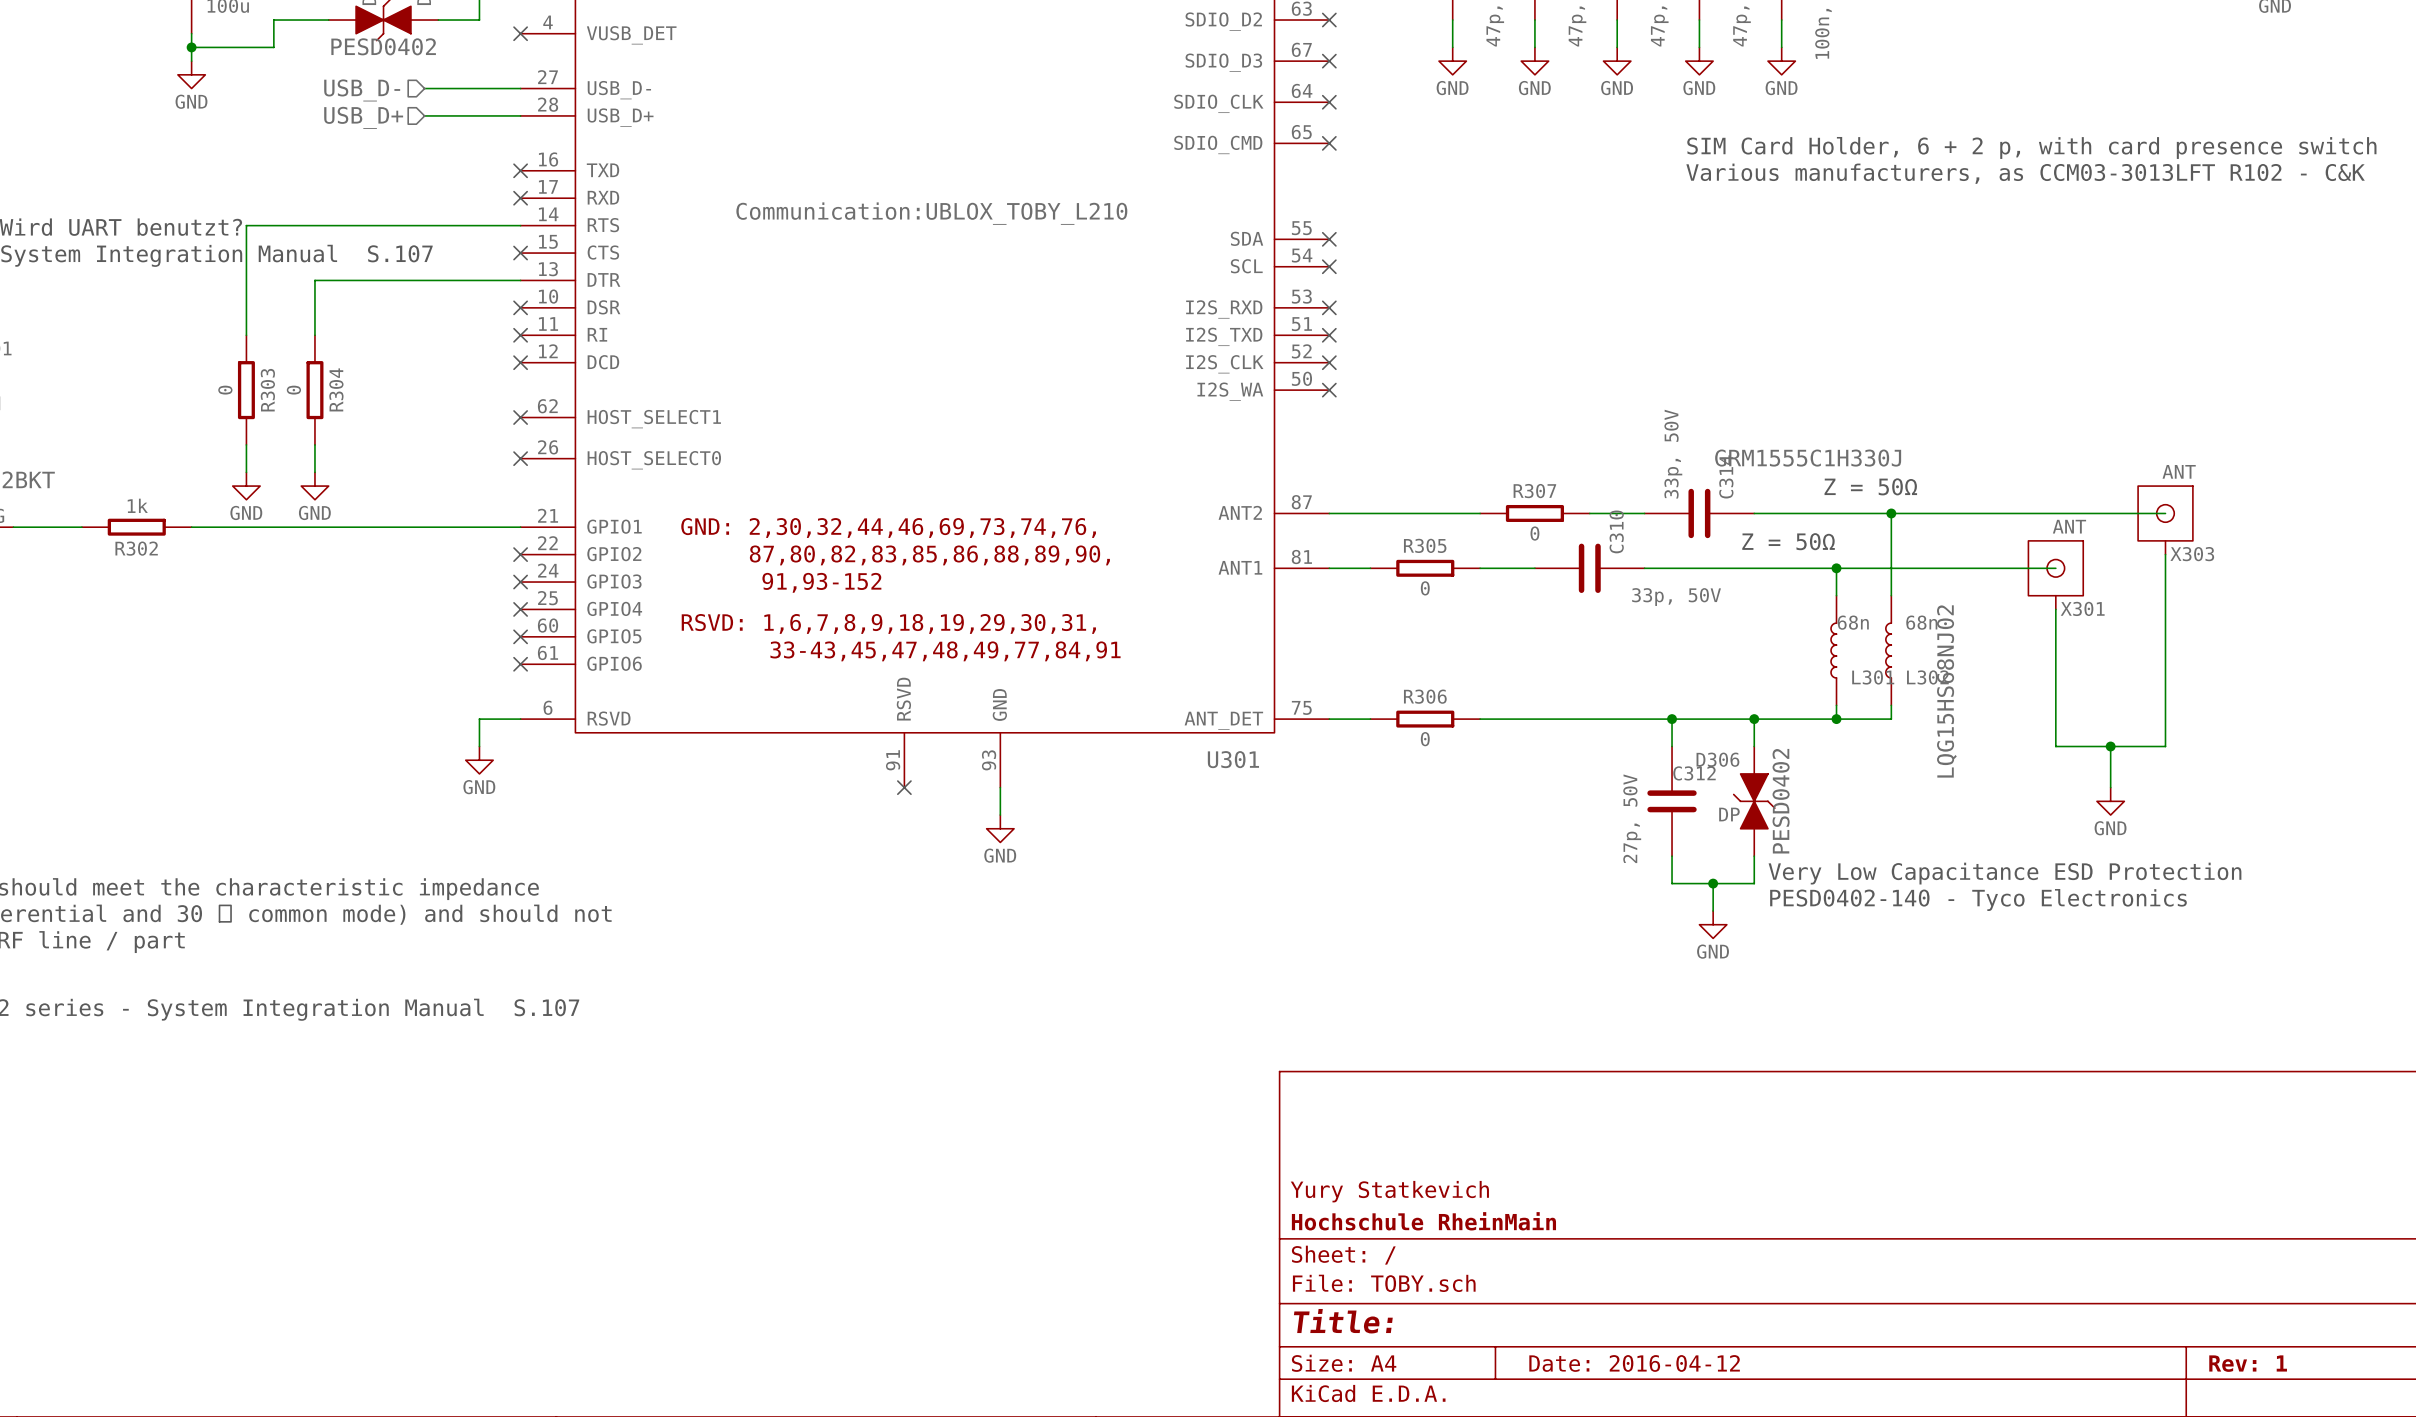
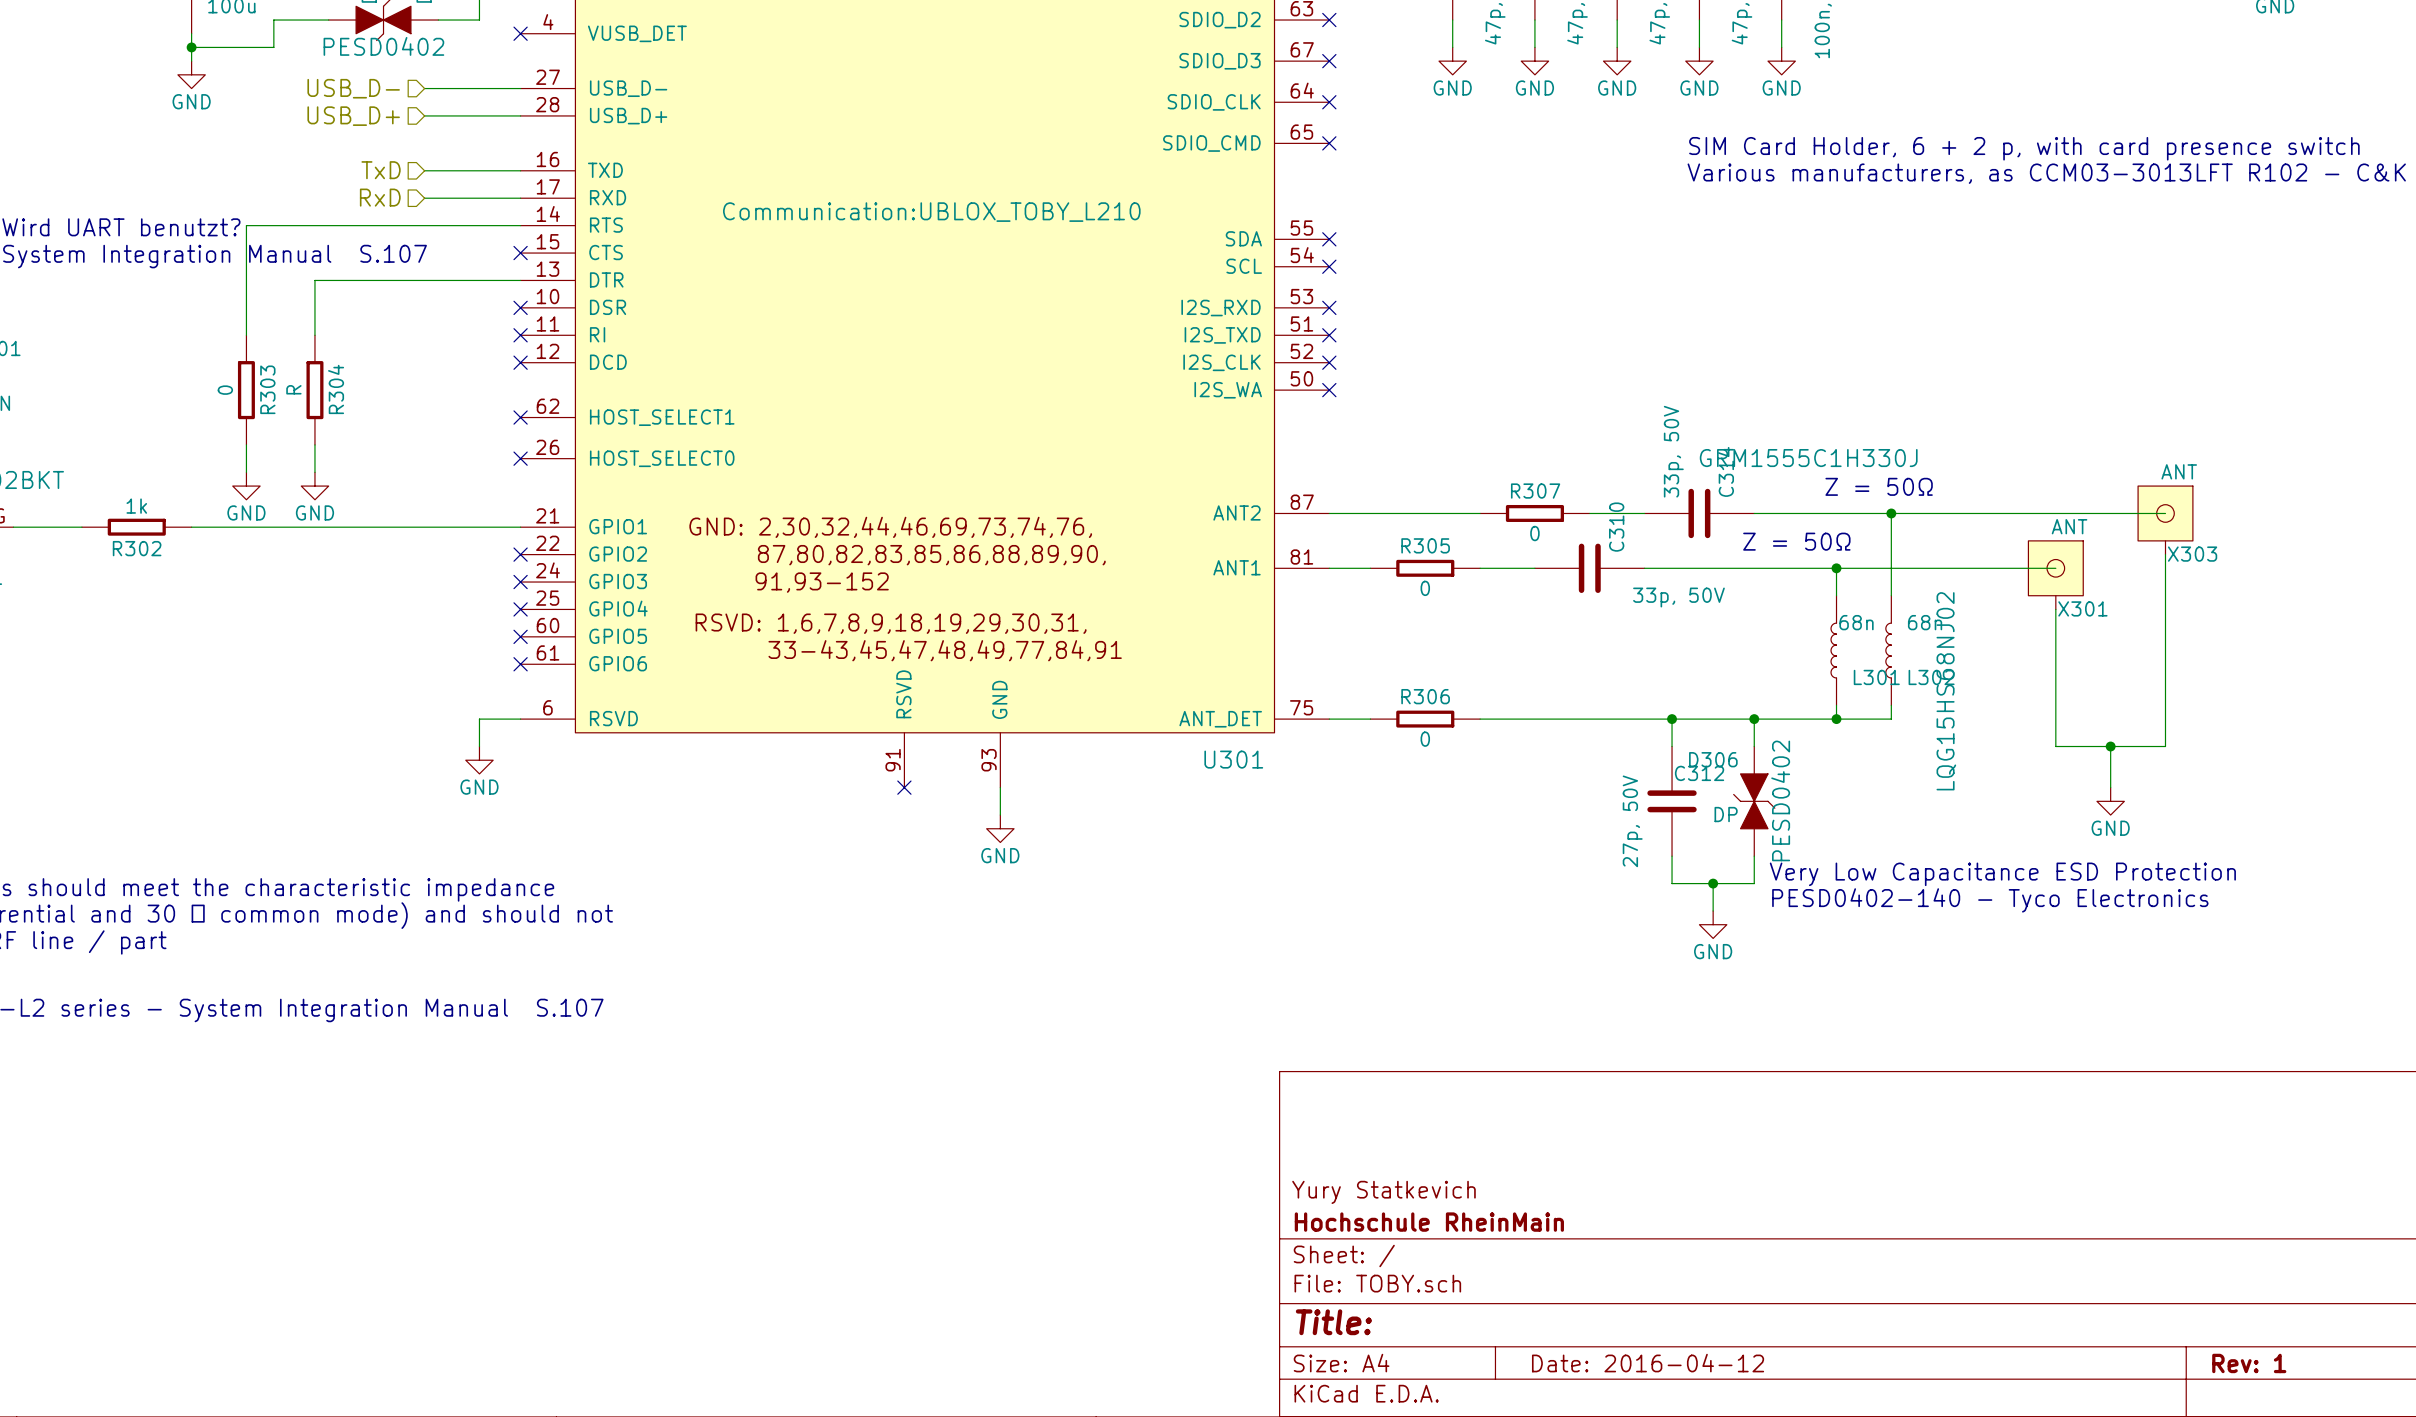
hierarchical label: none -> TxD (381, 170)
wire: none -> (424, 170) (520, 170)
no-connect mark: (520, 170) -> none
hierarchical label: none -> RxD (380, 197)
wire: none -> (424, 198) (520, 198)
no-connect mark: (520, 198) -> none
R304 value: 0 (293, 390) -> R (293, 389)

